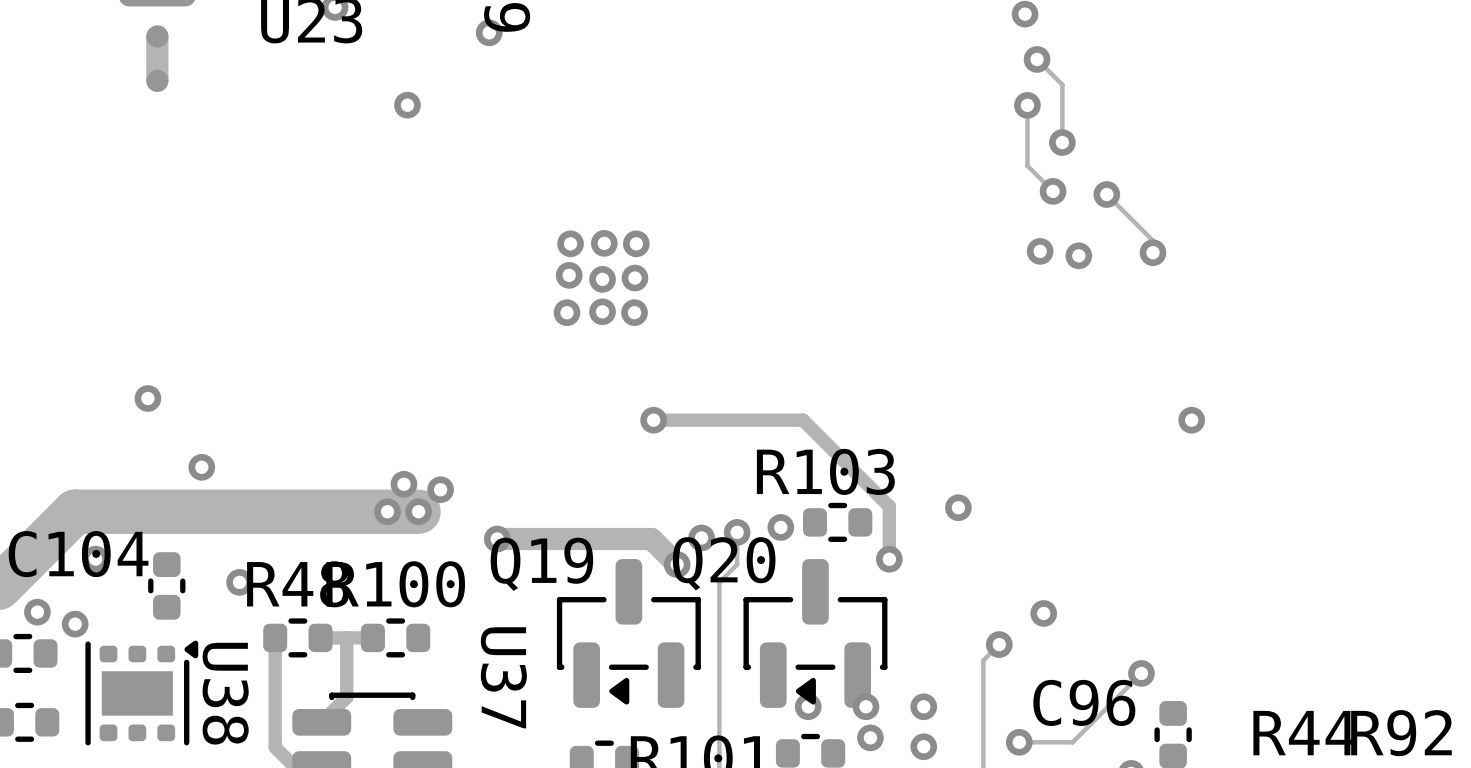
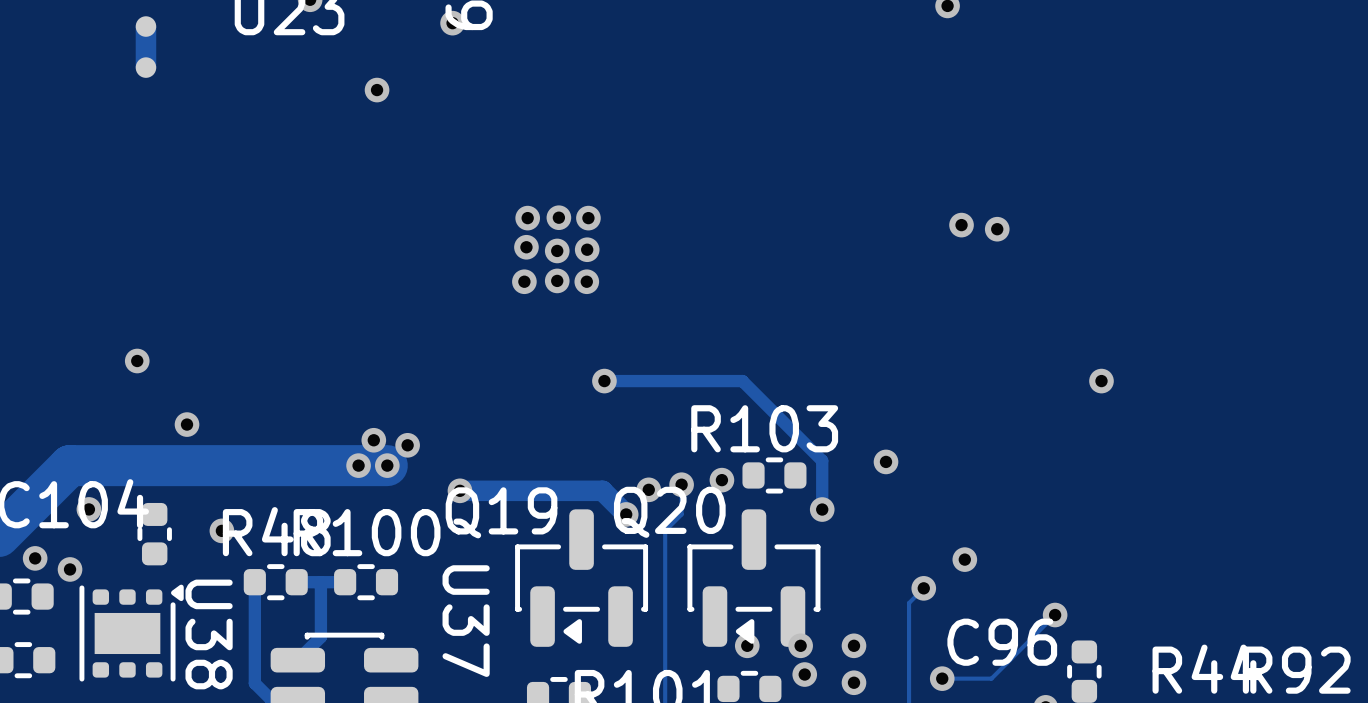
track: (1037, 59) (1062, 84) (1062, 142) -> none
via: (1037, 59) -> none
track: (1027, 105) (1027, 165) (1053, 191) -> none
via: (1027, 105) -> none
via: (1062, 142) -> none
via: (1053, 191) -> none
track: (1106, 194) (1153, 240) (1153, 252) -> none
via: (1106, 194) -> none
via: (1153, 252) -> none

